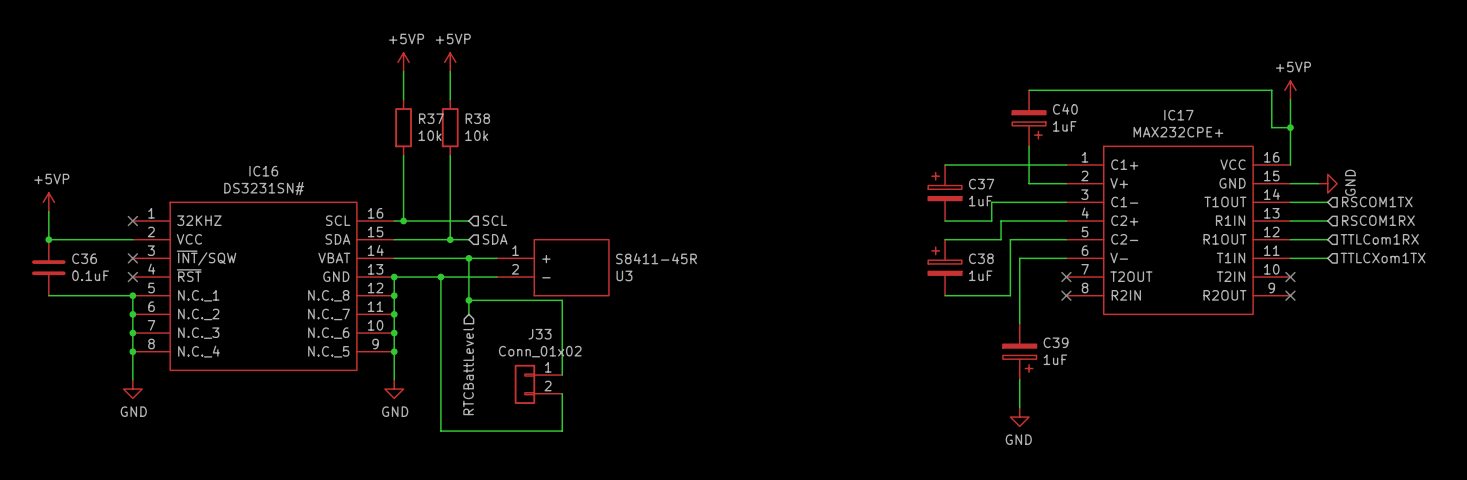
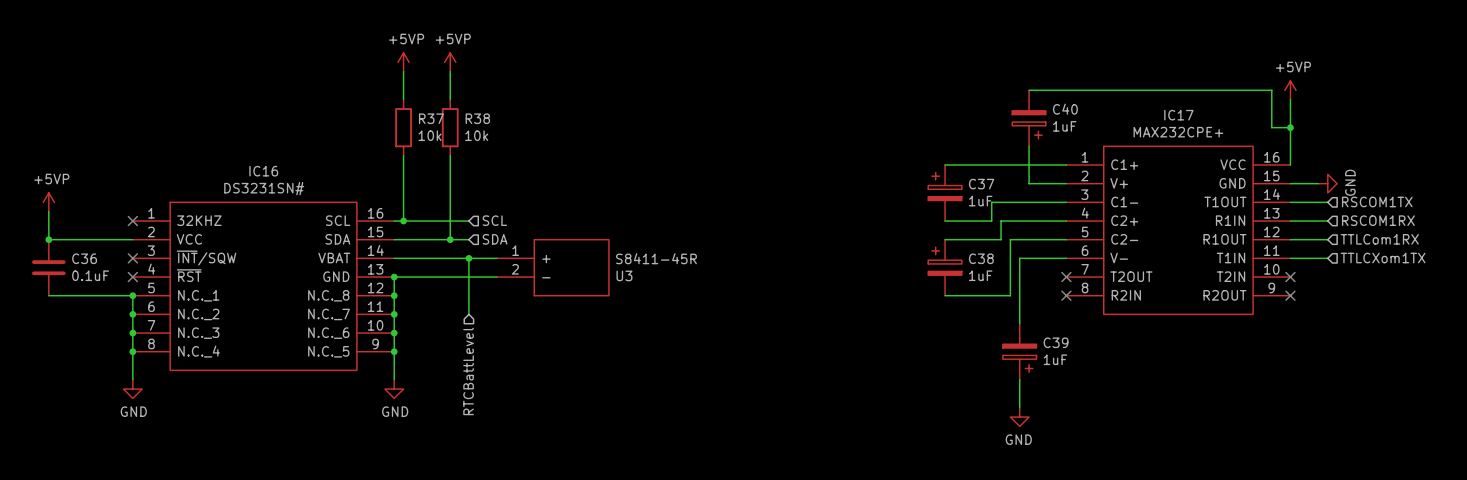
wire: (440, 277) (440, 431) (562, 431) (562, 393) -> none
junction: (440, 277) -> none
wire: (468, 300) (562, 300) (562, 375) -> none
junction: (468, 300) -> none
J33: Conn_01x02 (538, 384) -> none

